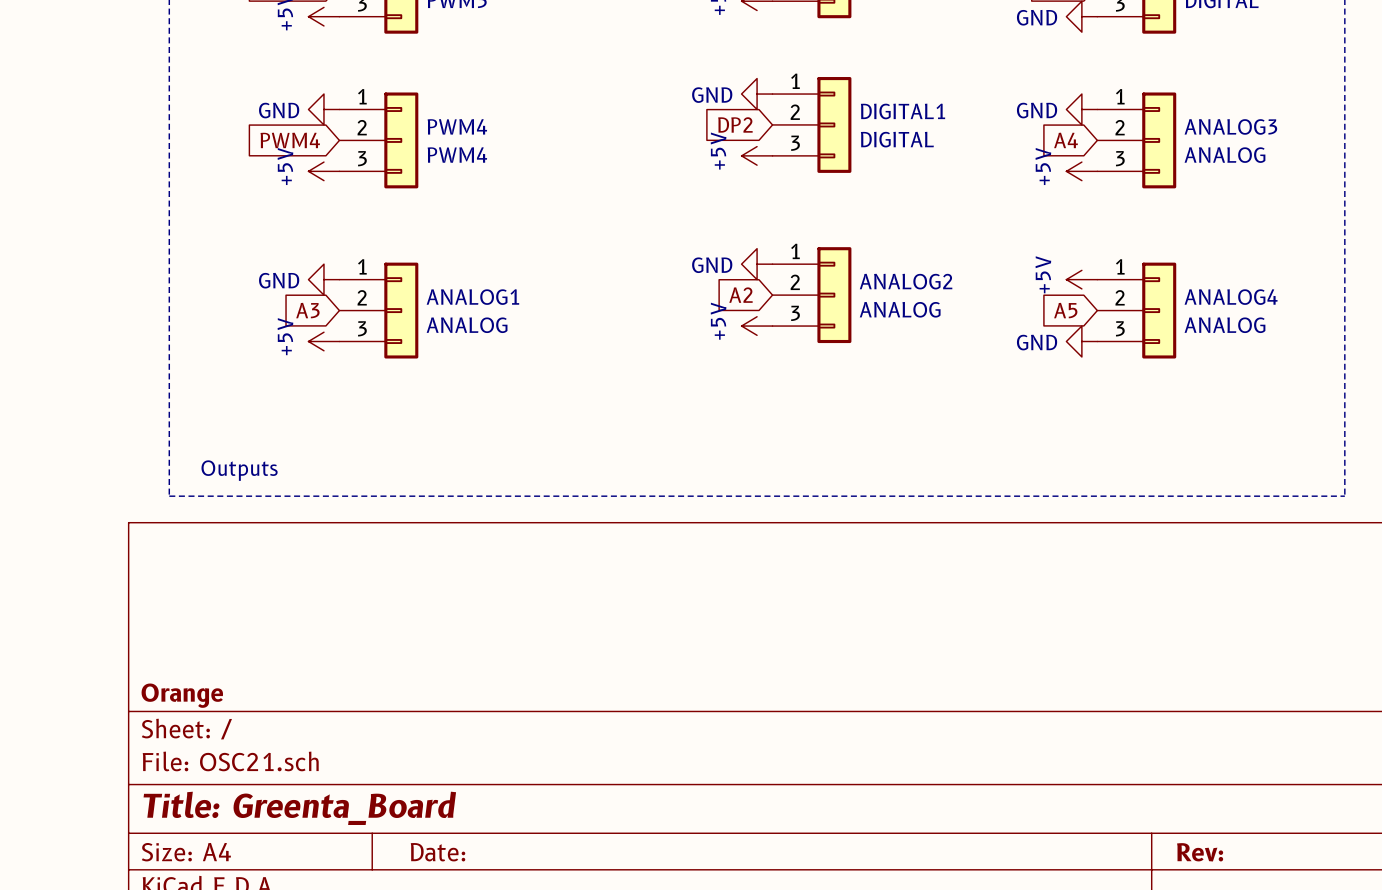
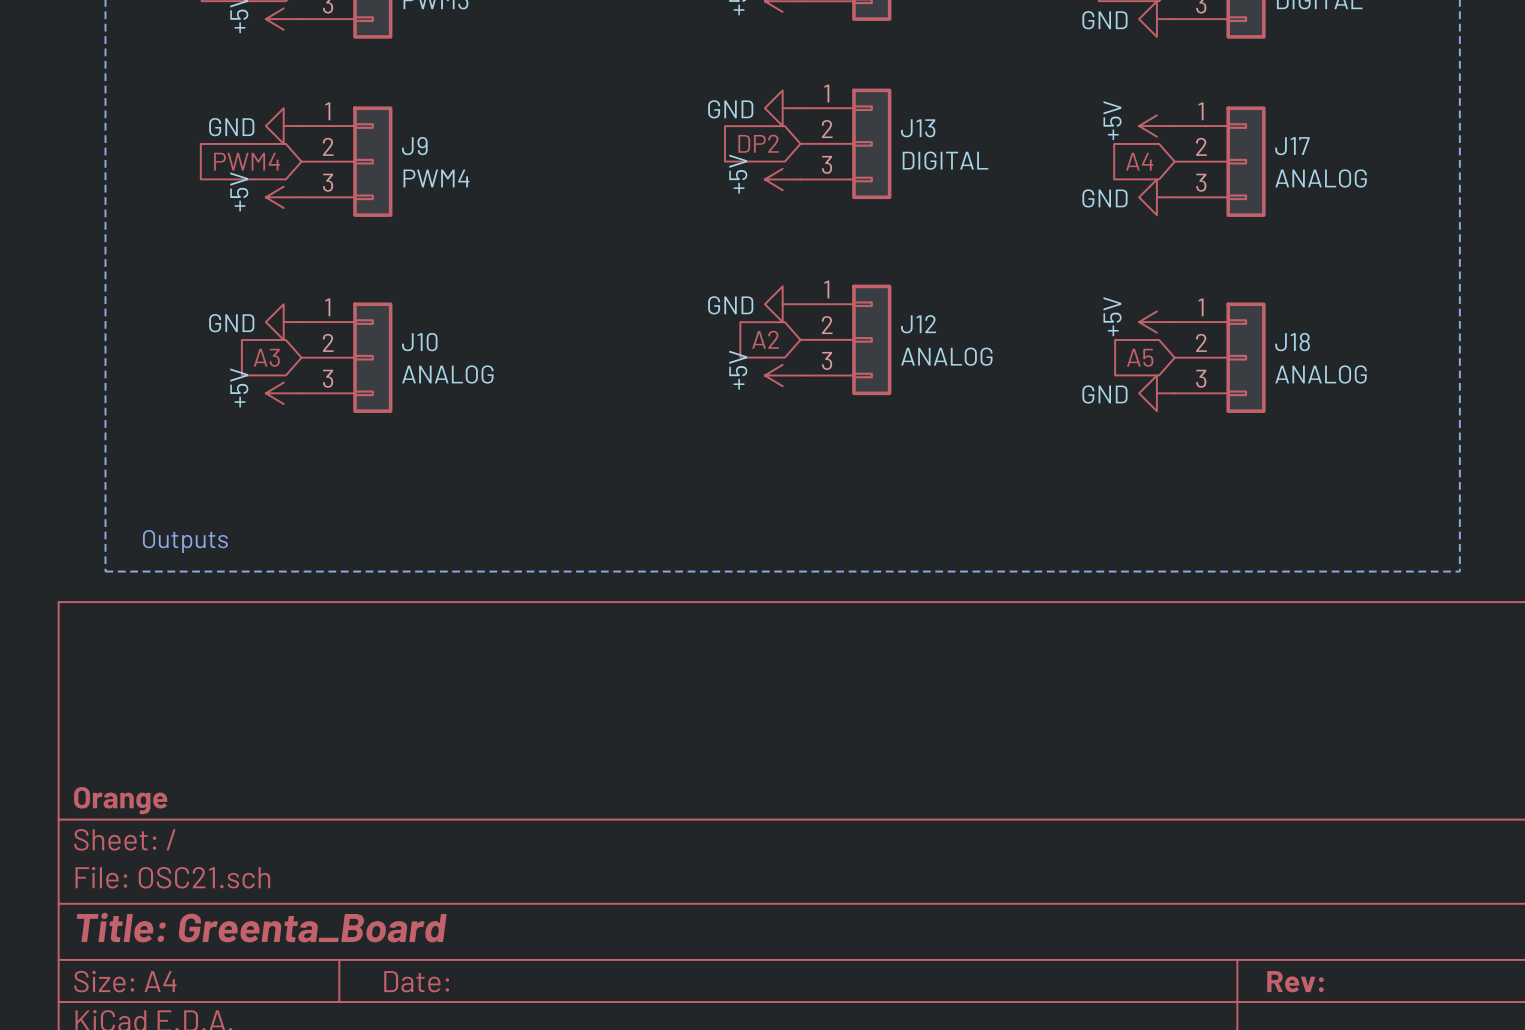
power symbol: GND (1081, 109) -> +5V (1156, 126)
DIGITAL1 name: DIGITAL1 (903, 111) -> J13 (918, 128)
PWM4 name: PWM4 (457, 126) -> J9 (414, 146)
ANALOG3 name: ANALOG3 (1230, 126) -> J17 (1292, 146)
power symbol: +5V (1081, 171) -> GND (1156, 197)
ANALOG2 name: ANALOG2 (906, 281) -> J12 (918, 324)
ANALOG1 name: ANALOG1 (472, 297) -> J10 (419, 342)
ANALOG4 name: ANALOG4 (1231, 297) -> J18 (1292, 342)

